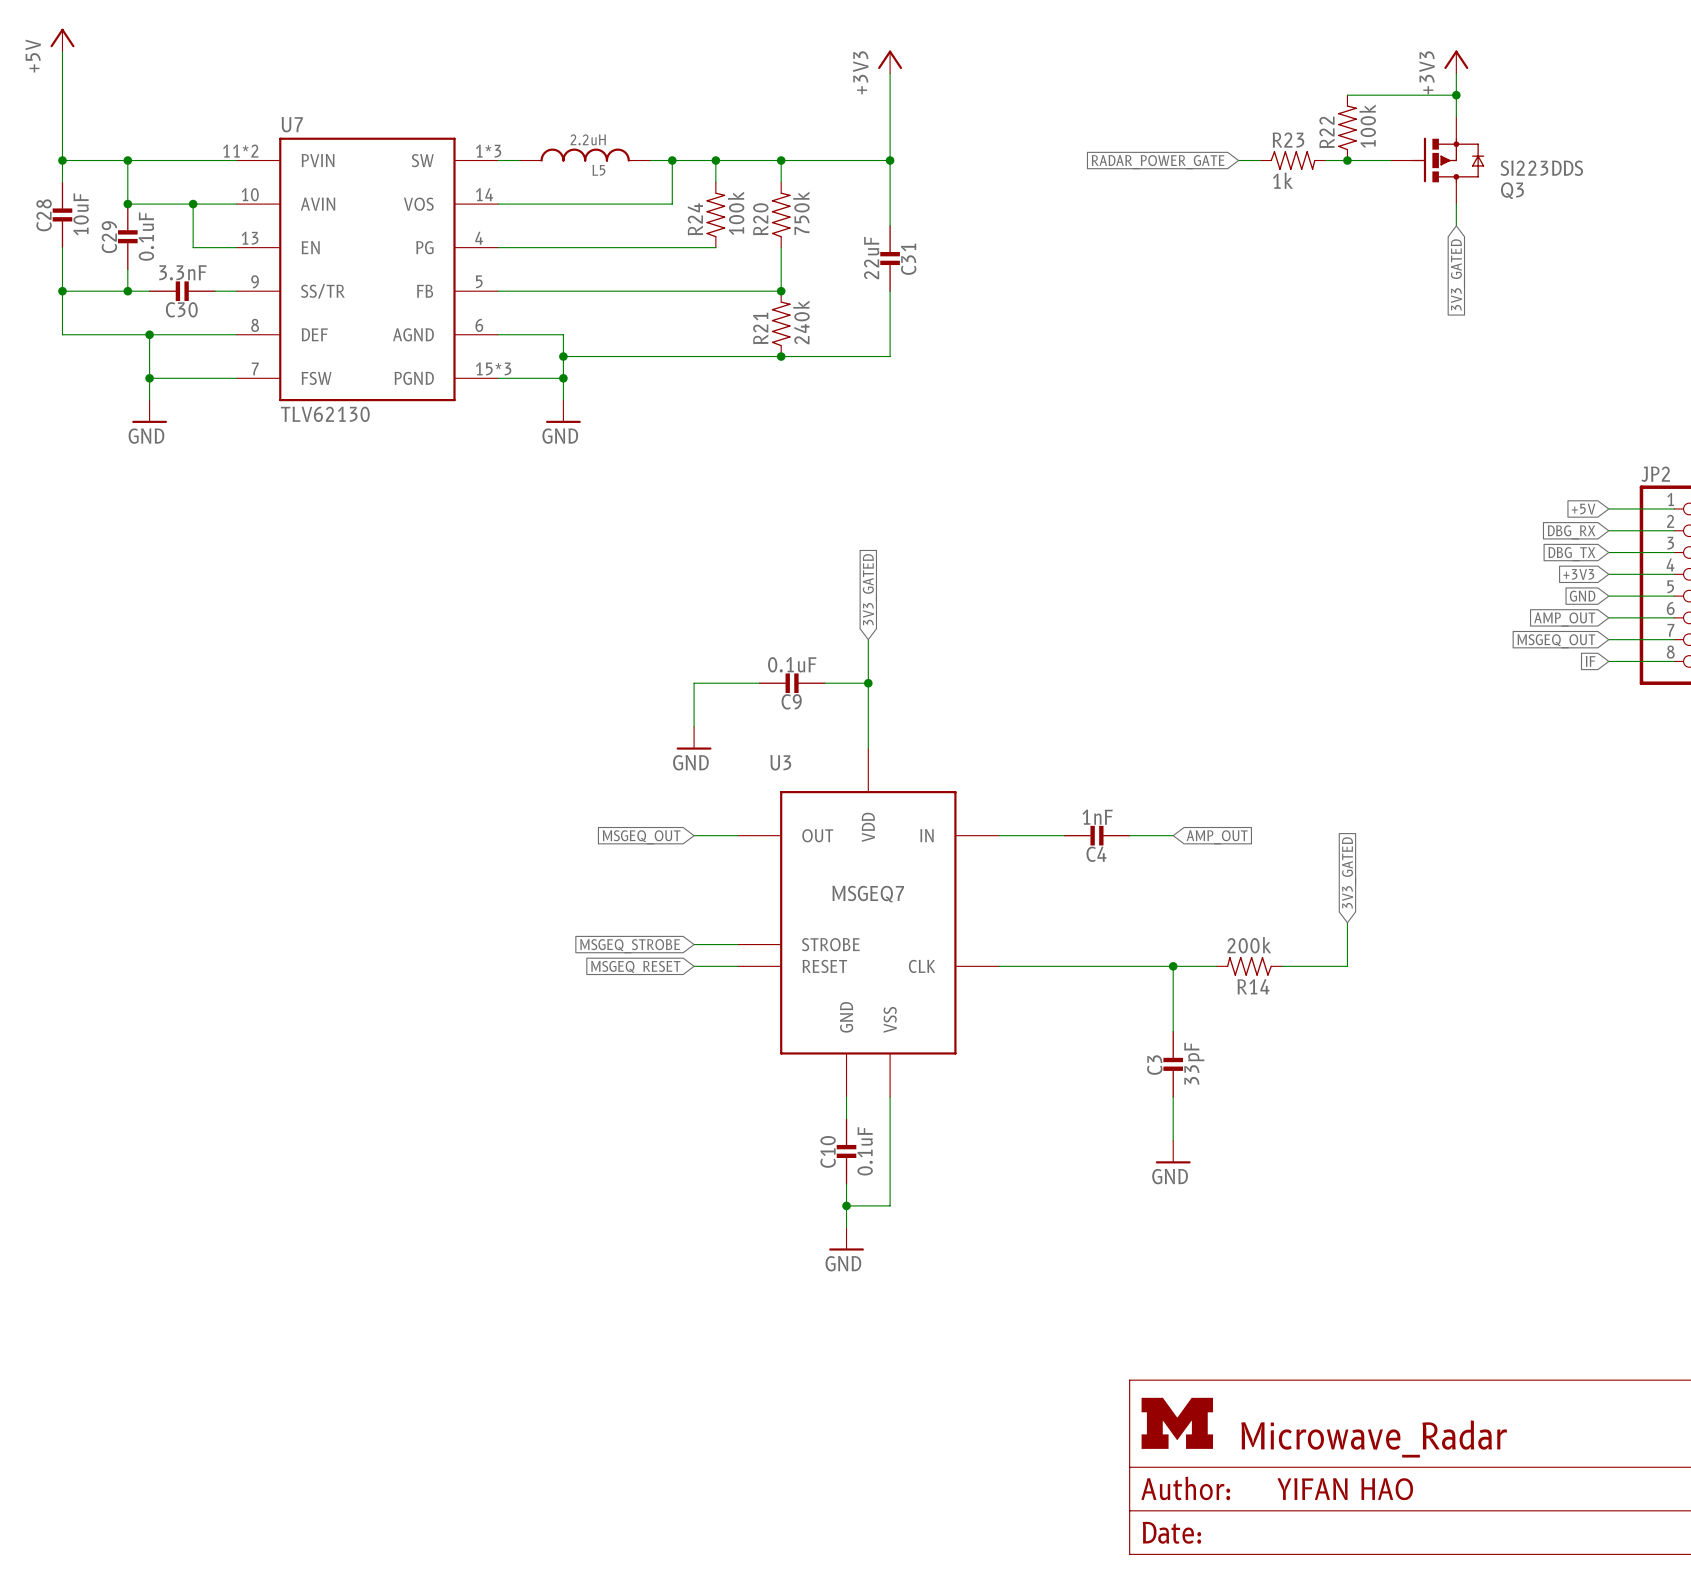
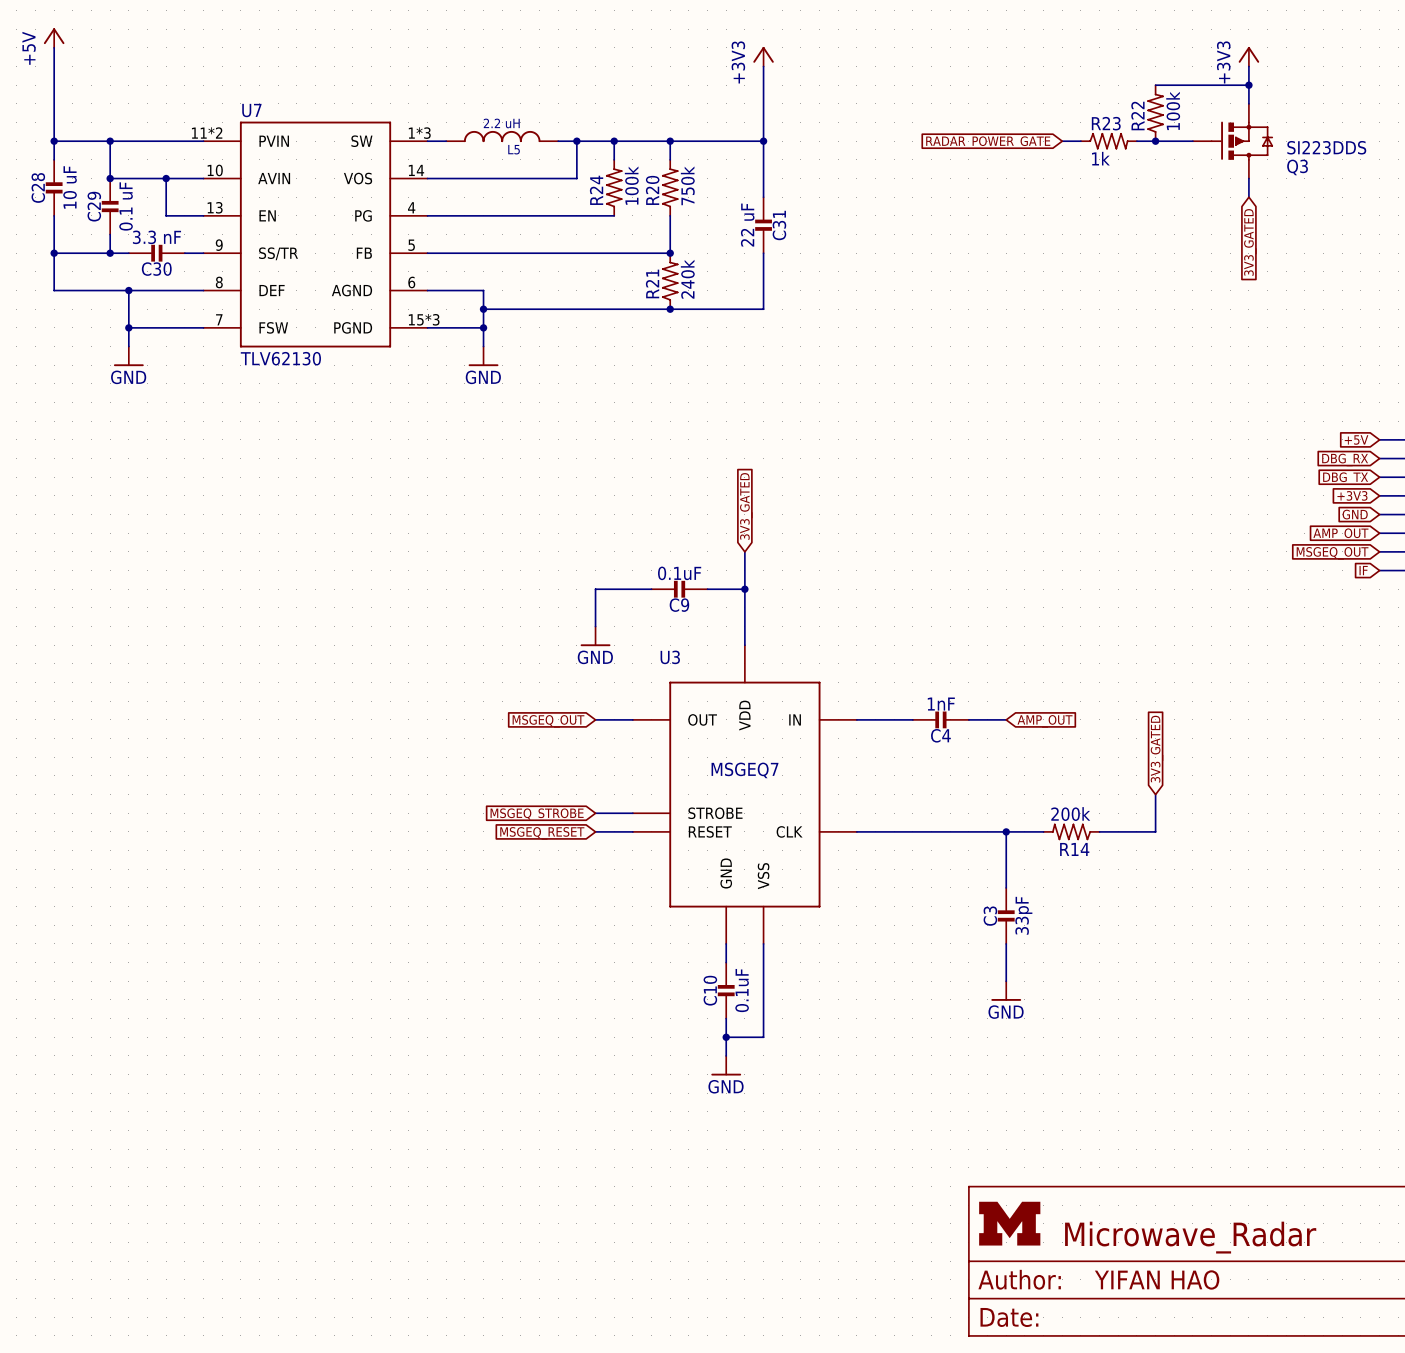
L5 value: 2.2uH (588, 139) -> 2.2 uH (501, 123)
C28 value: 10uF (81, 214) -> 10 uF (70, 187)
C29 value: 0.1uF (146, 236) -> 0.1 uF (126, 206)
C31 value: 22uF (871, 258) -> 22 uF (747, 225)
C30 value: 3.3nF (182, 272) -> 3.3 nF (156, 237)

